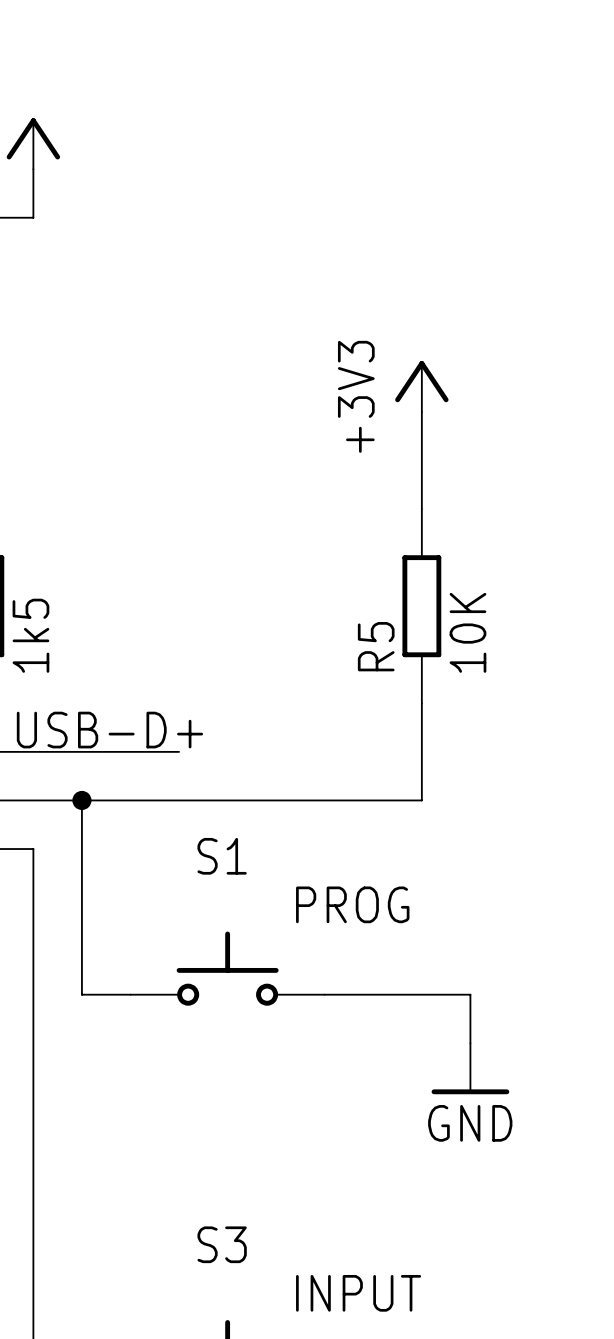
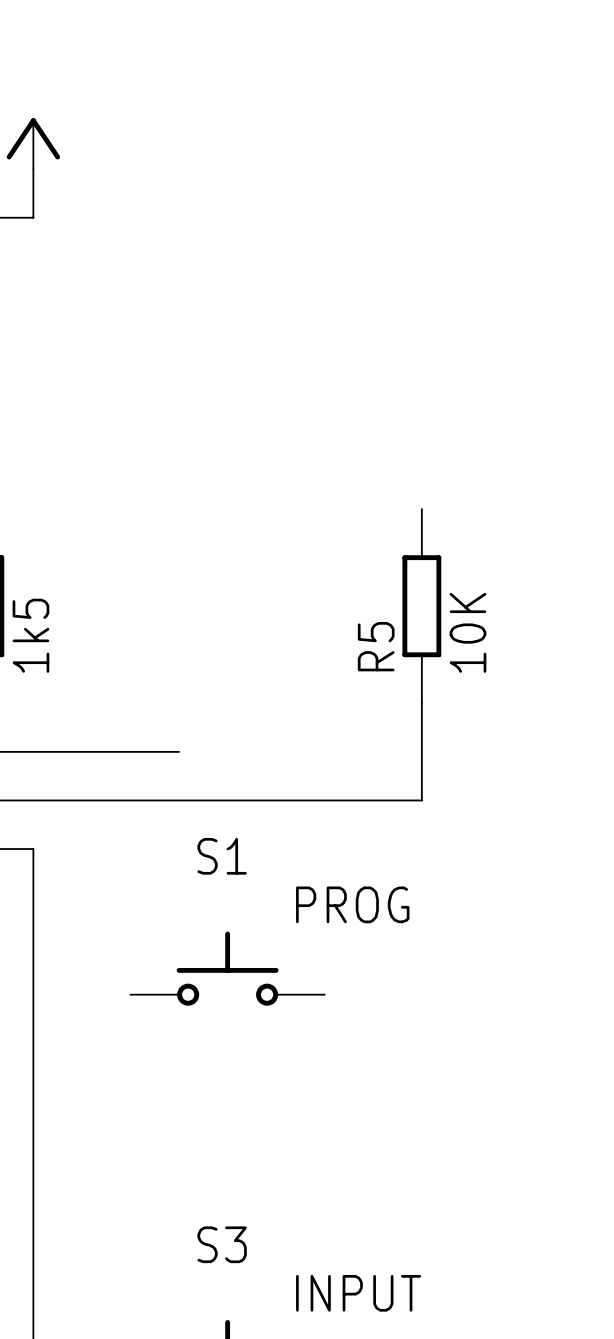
power symbol: +3V3 (421, 386) -> none
wire: (421, 411) (421, 509) -> none
label: USB-D+ (109, 730) -> none
wire: (81, 800) (81, 994) (130, 994) -> none
junction: (81, 800) -> none
wire: (324, 994) (470, 994) (470, 1043) -> none
power symbol: GND (470, 1068) -> none

